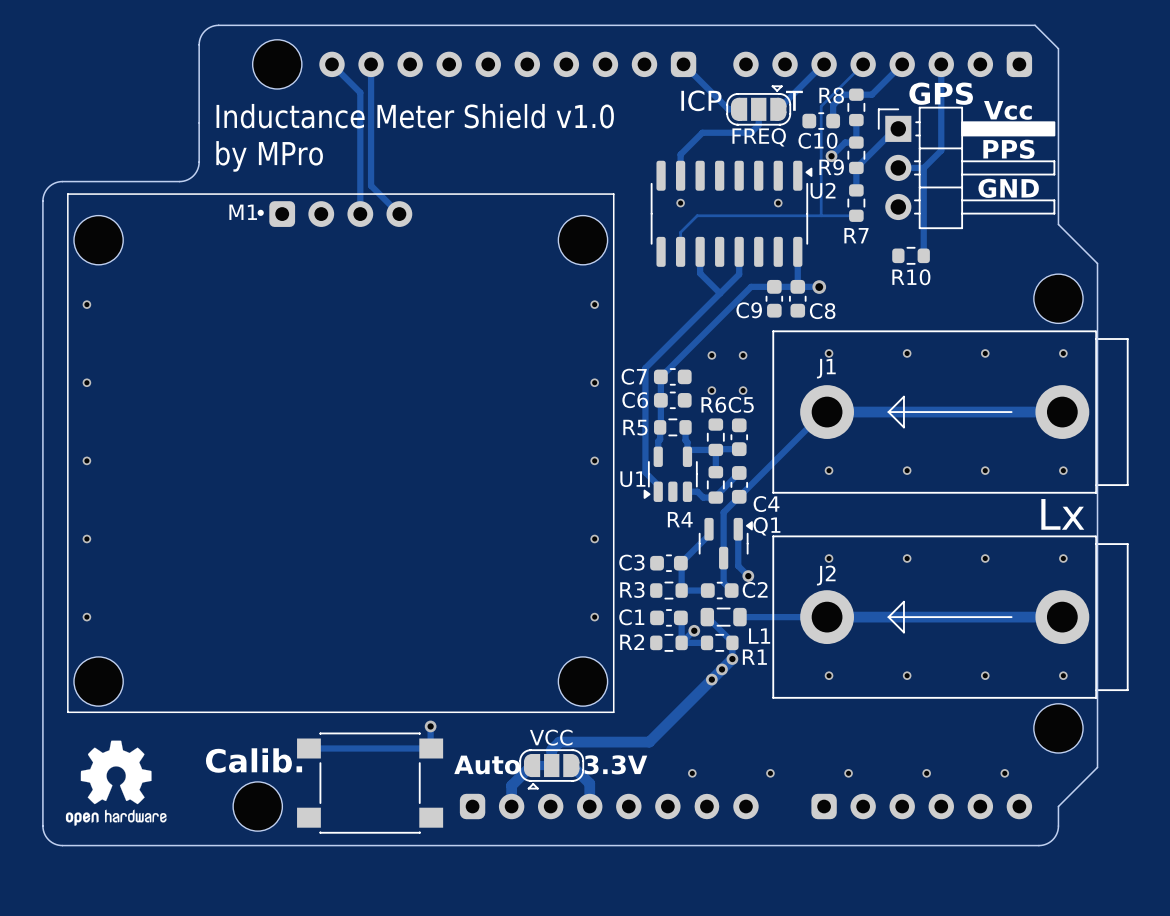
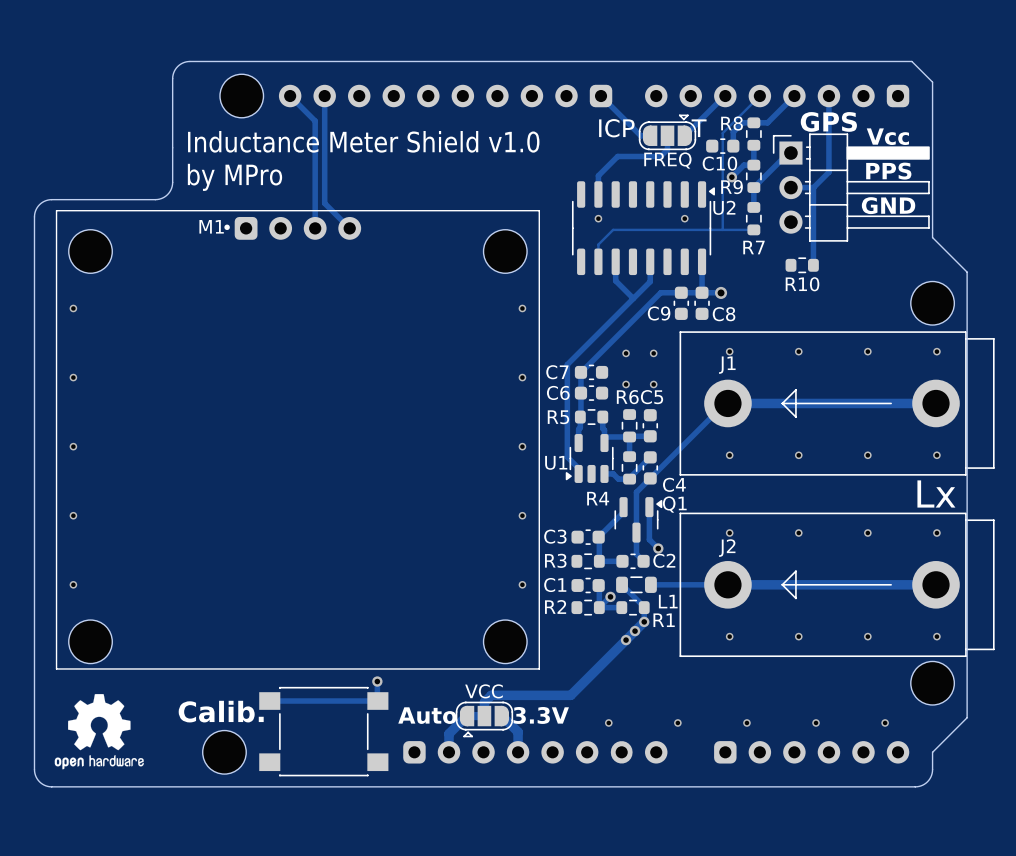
M1 footprint: [67, 193, 615, 714] -> [55, 210, 540, 670]

